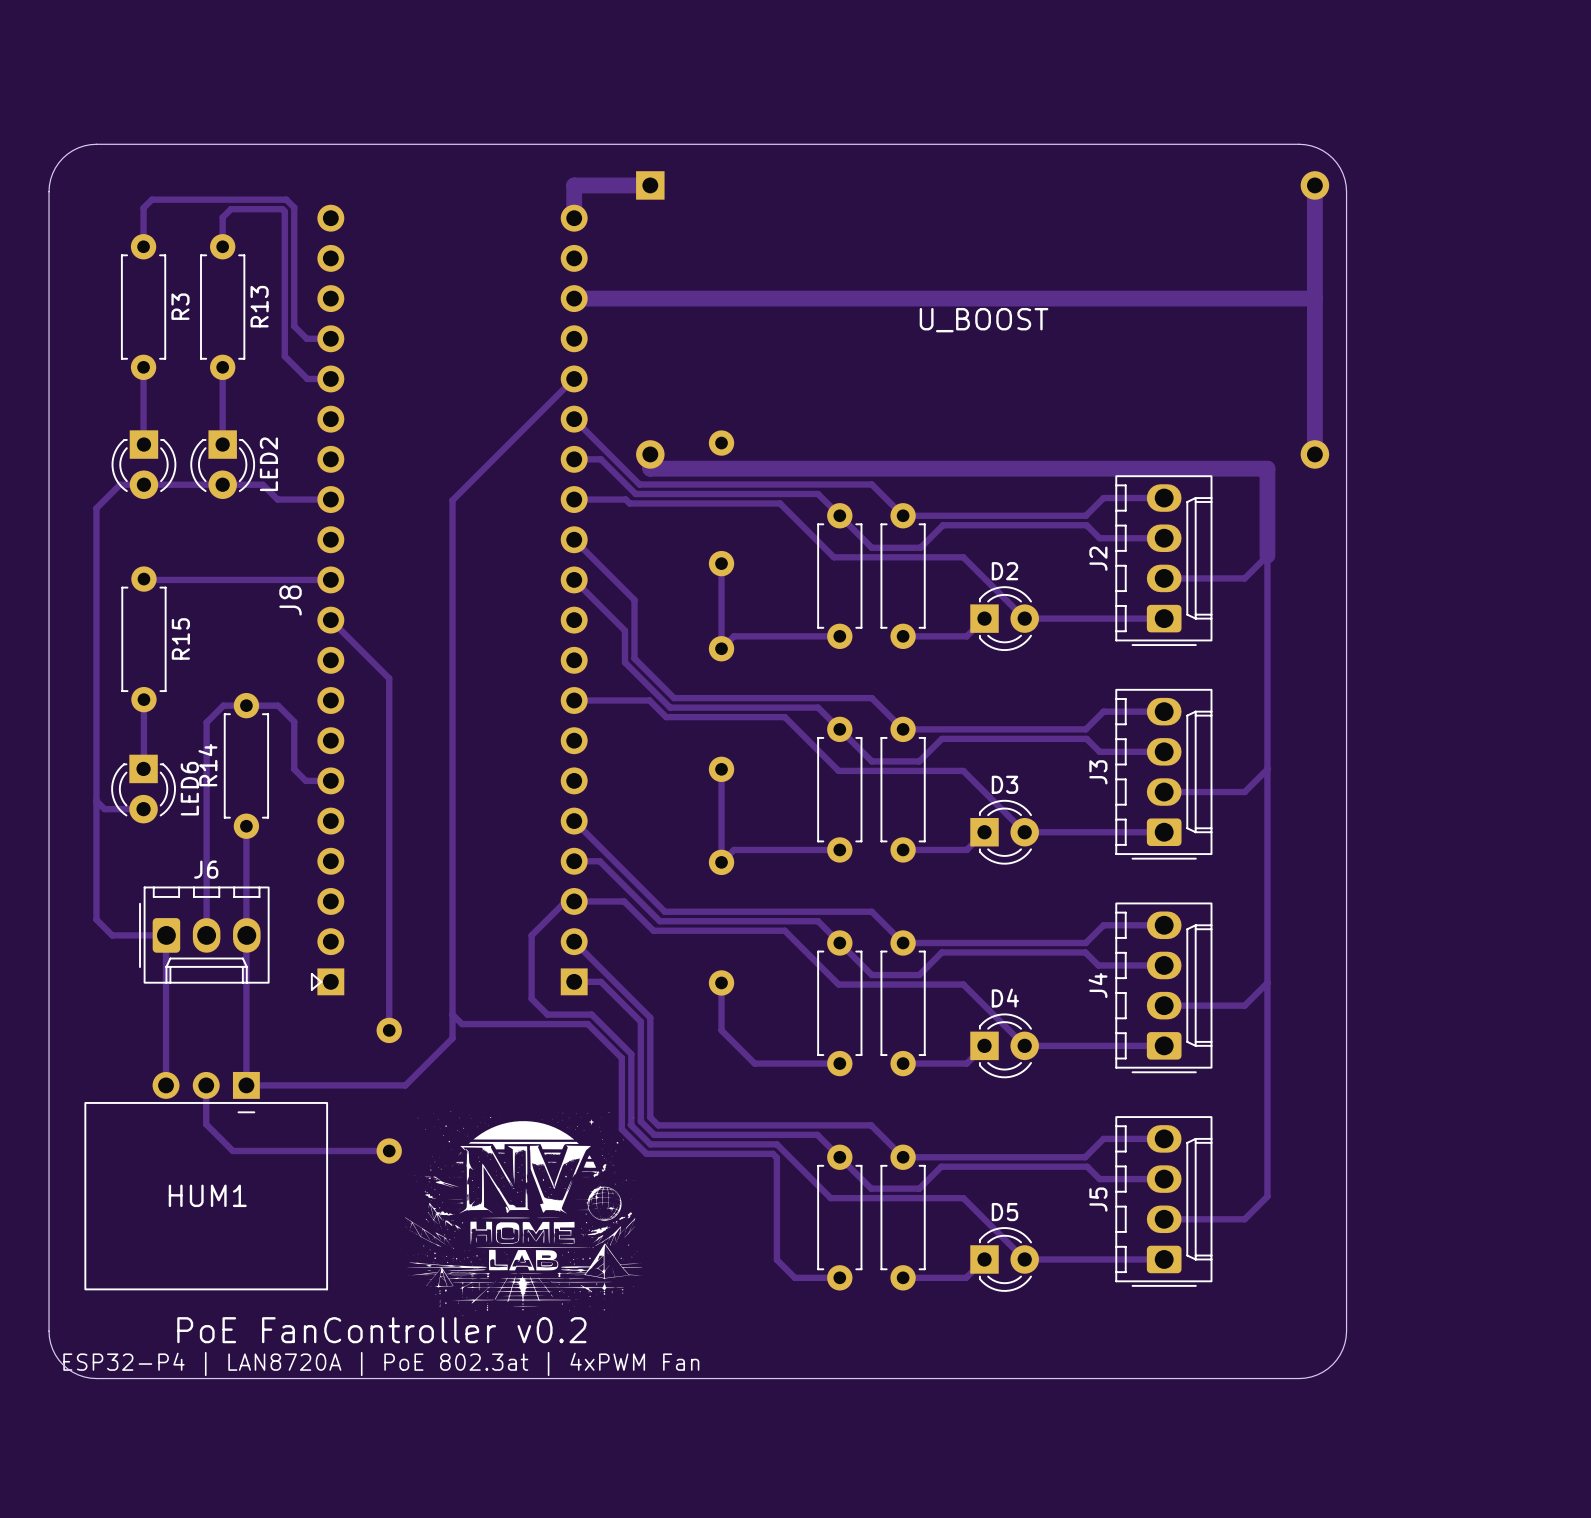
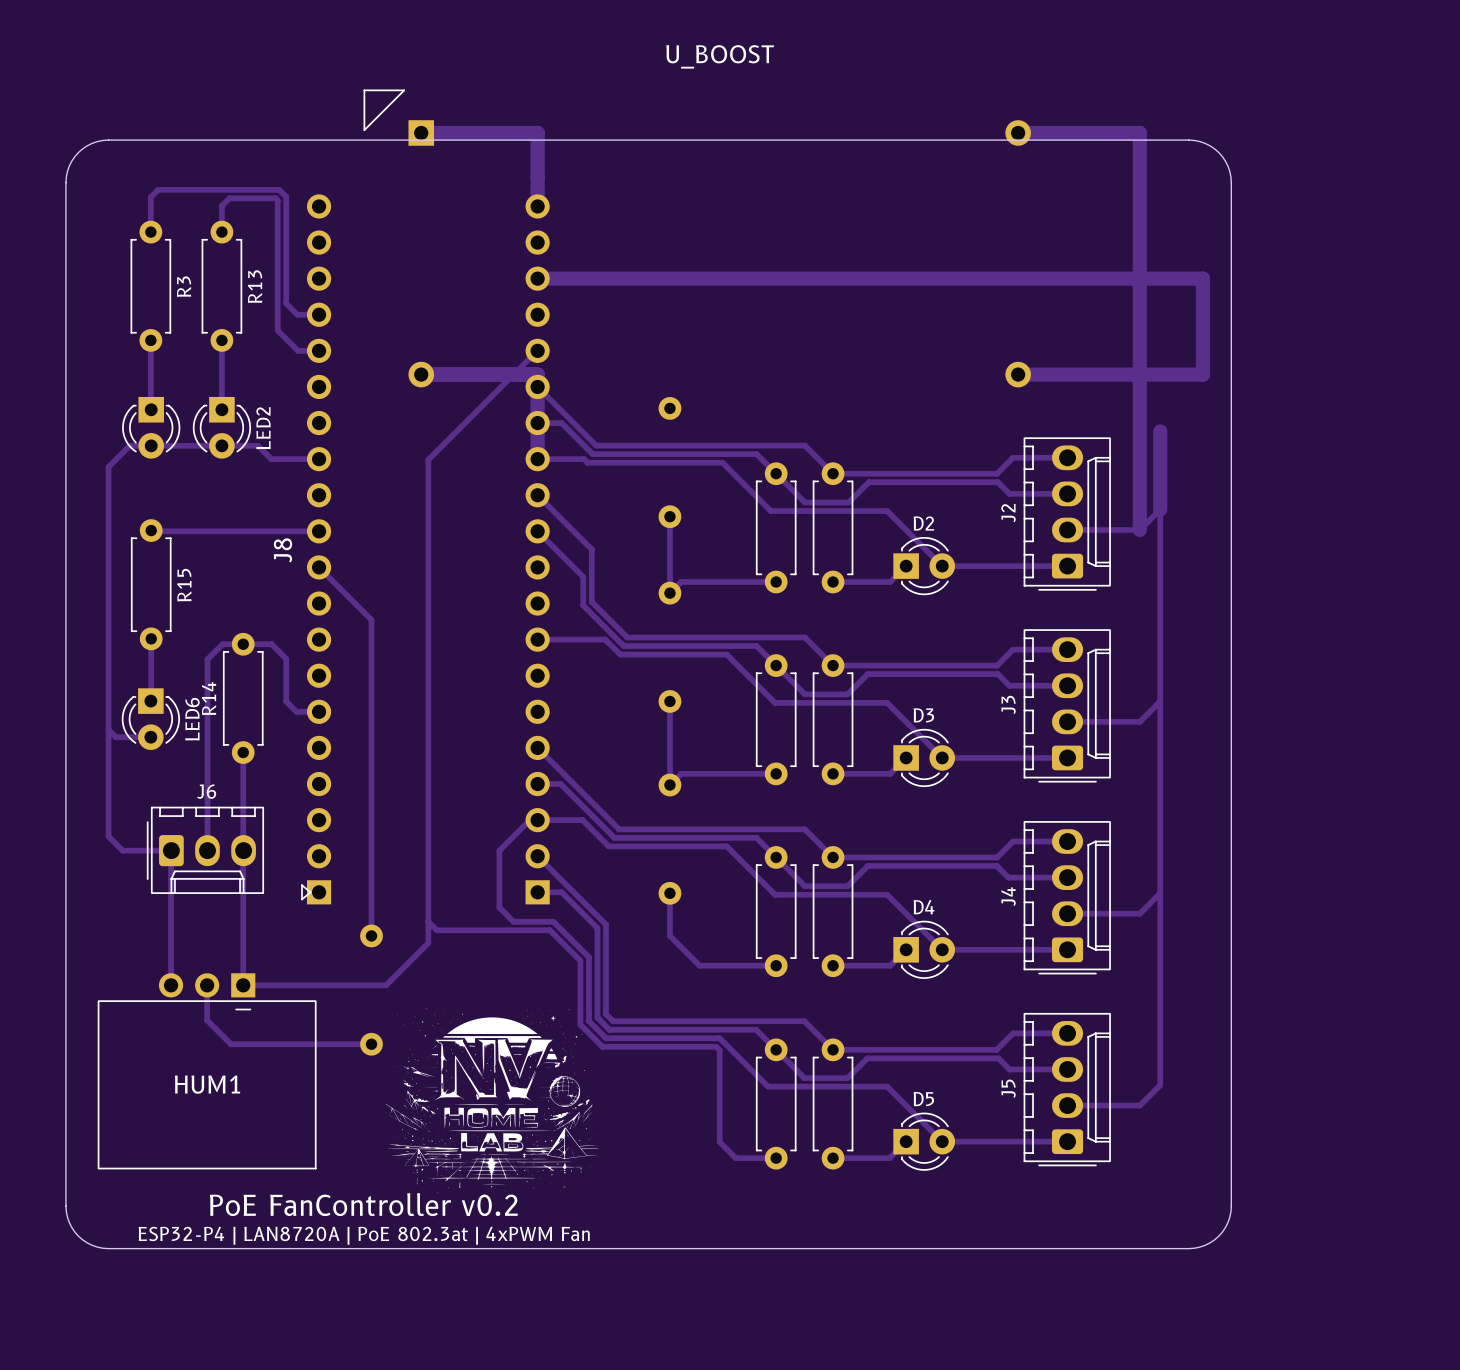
track: none -> (1018, 132) (1139, 132) (1139, 530)
track: (574, 185) (650, 185) -> (537, 177) (537, 132) (421, 132)
track: (1314, 185) (1314, 298) -> none
U_BOOST: none -> (697, 238)
U_BOOST: (982, 319) -> none
track: none -> (421, 374) (537, 374) (537, 459)
track: (1314, 405) (1314, 454) -> (1202, 374) (1018, 374)
track: (650, 454) (650, 468) (1267, 468) -> none

